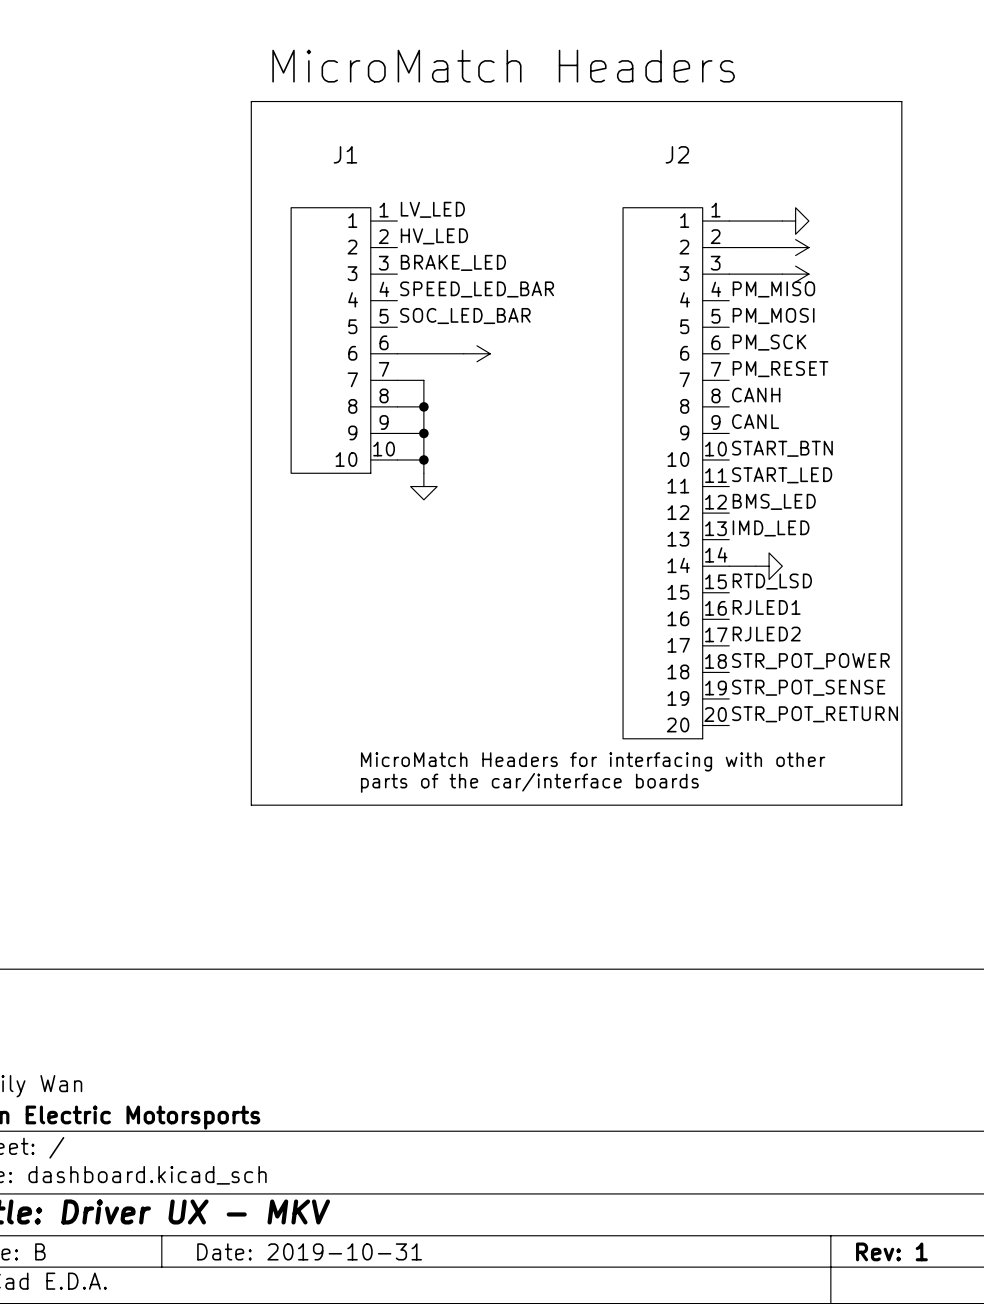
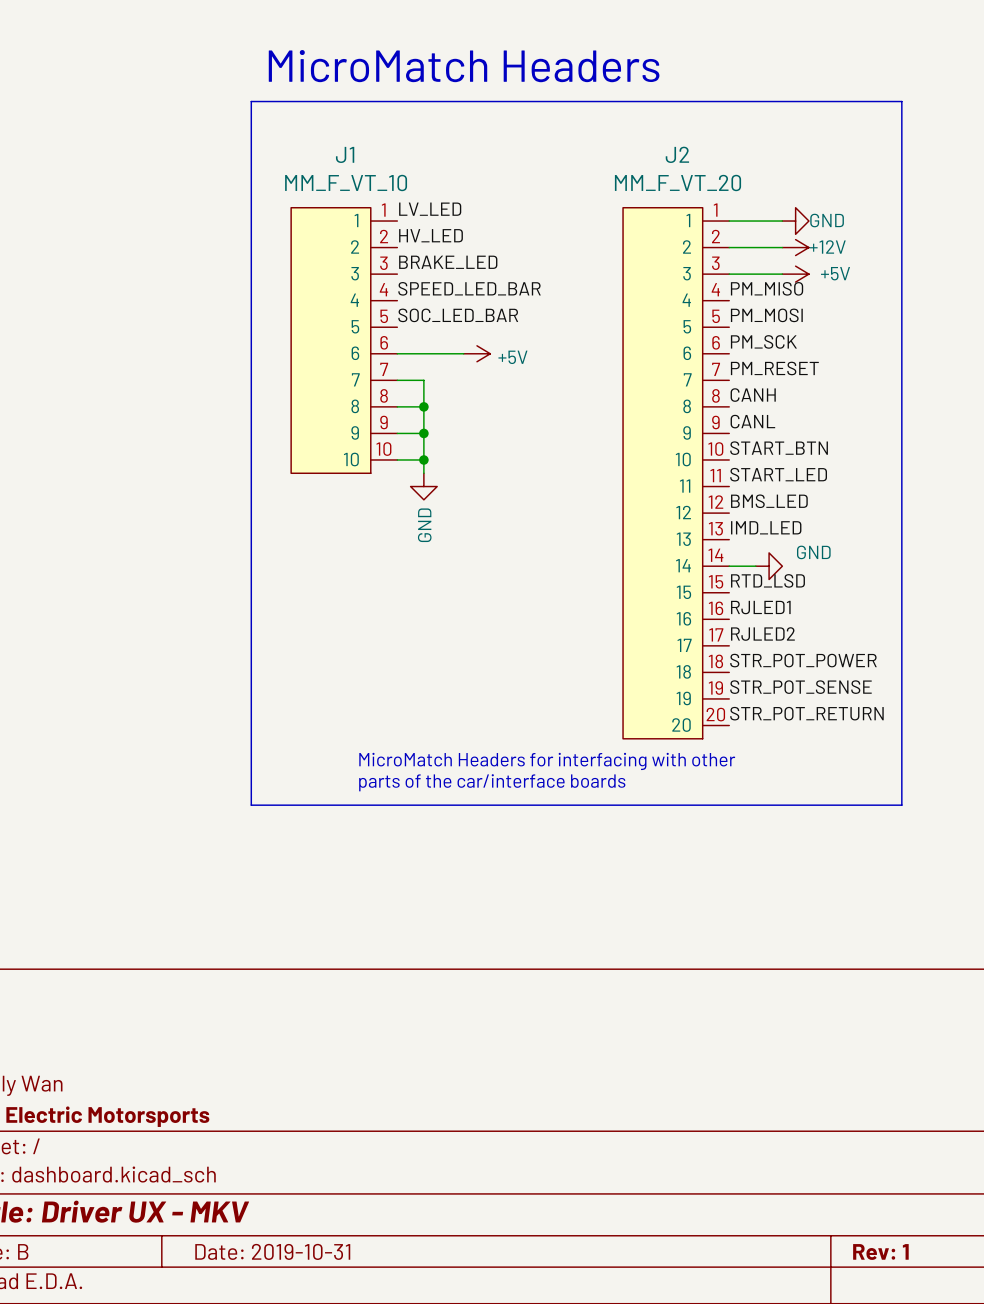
J1 value: none -> MM_F_VT_10 (346, 182)
J2 value: none -> MM_F_VT_20 (677, 182)
power symbol text: none -> GND (827, 220)
power symbol text: none -> +12V (827, 247)
power symbol text: none -> +5V (835, 273)
power symbol text: none -> +5V (512, 357)
power symbol text: none -> GND (424, 525)
power symbol text: none -> GND (813, 552)

